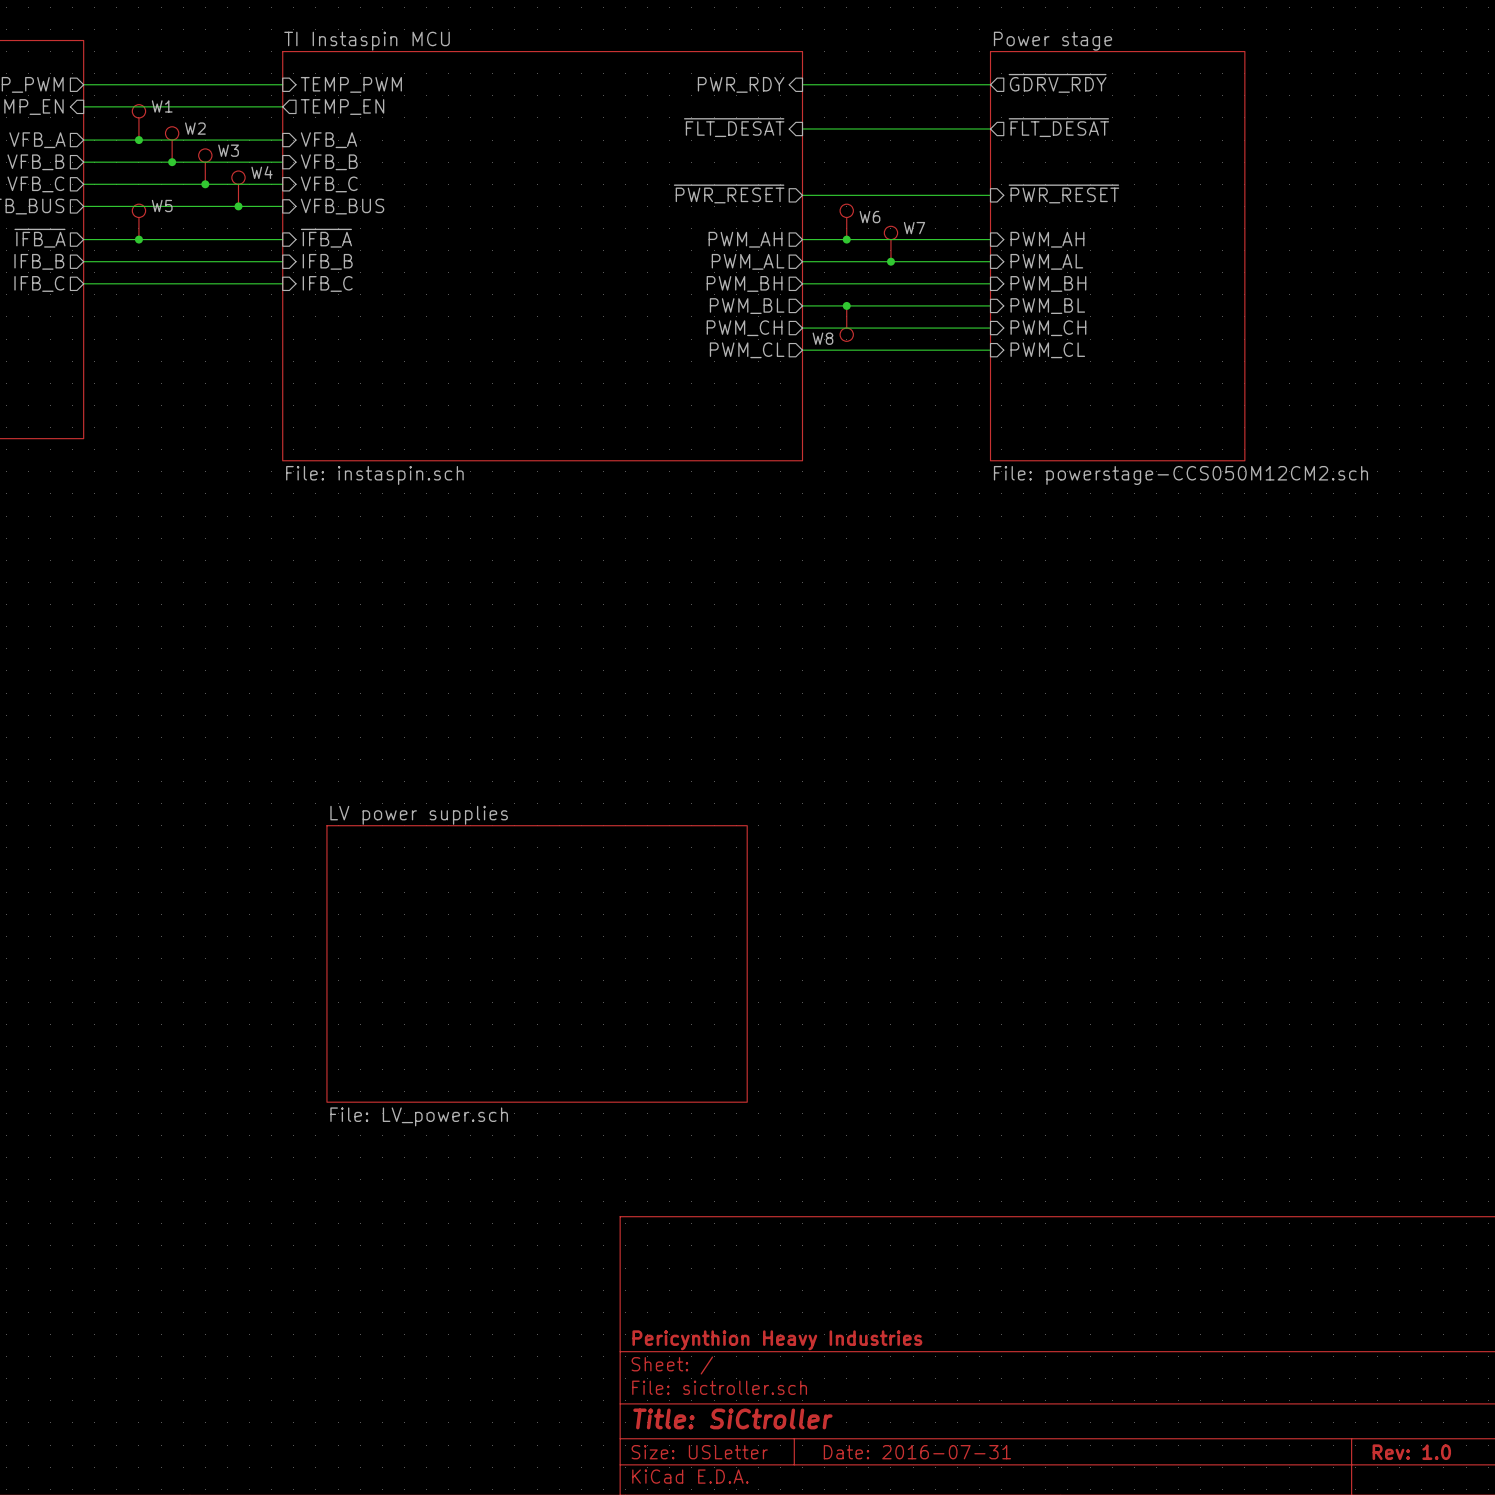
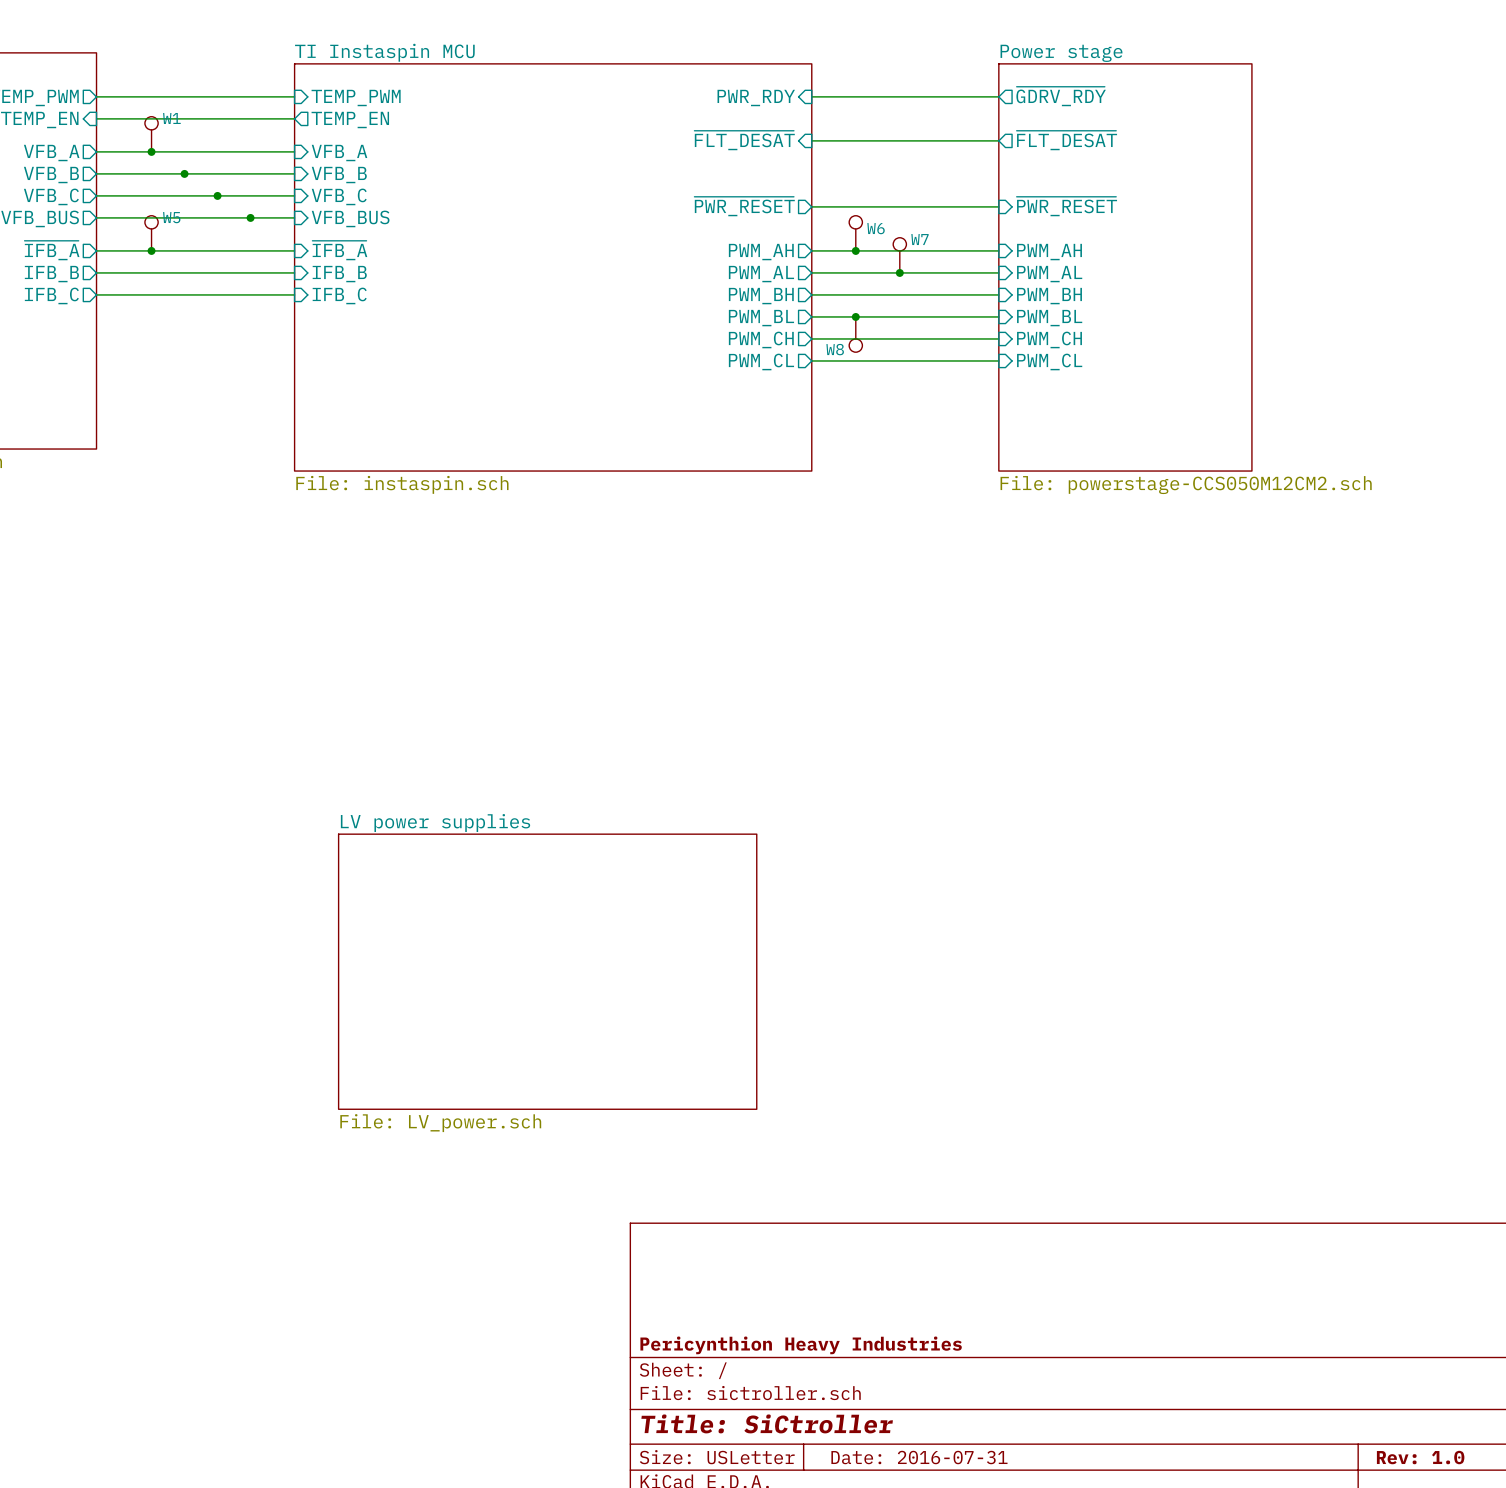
W2: (172, 144) -> none
W3: (205, 166) -> none
W4: (238, 188) -> none

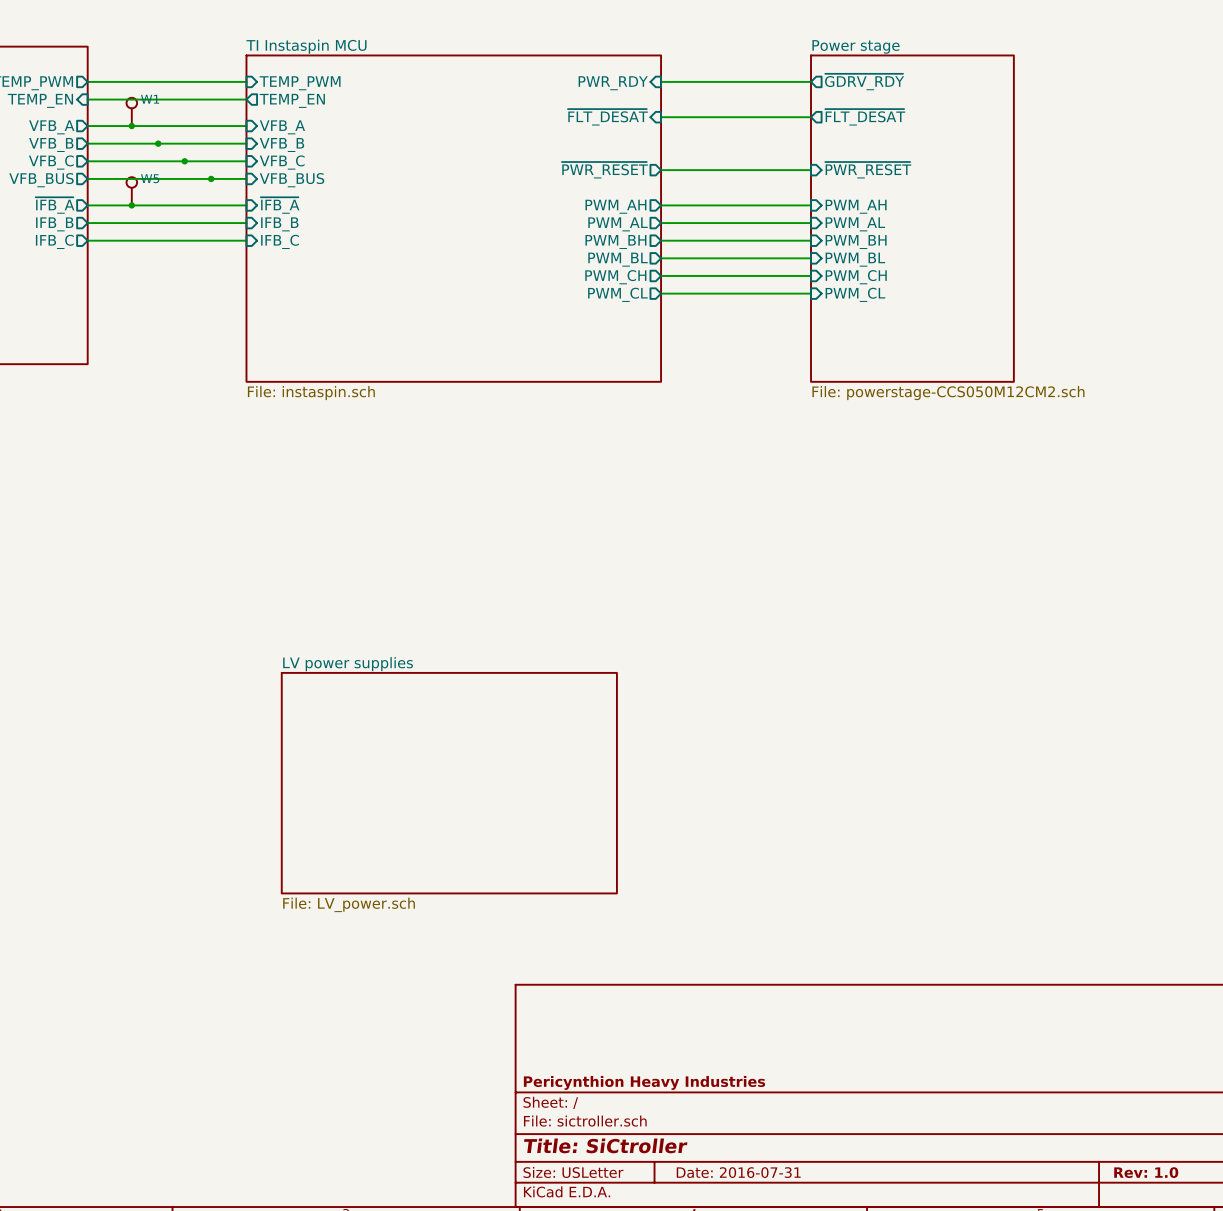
W6: (855, 233) -> none
junction: (855, 250) -> none
W7: (899, 255) -> none
junction: (899, 272) -> none
junction: (855, 316) -> none
W8: (855, 334) -> none

